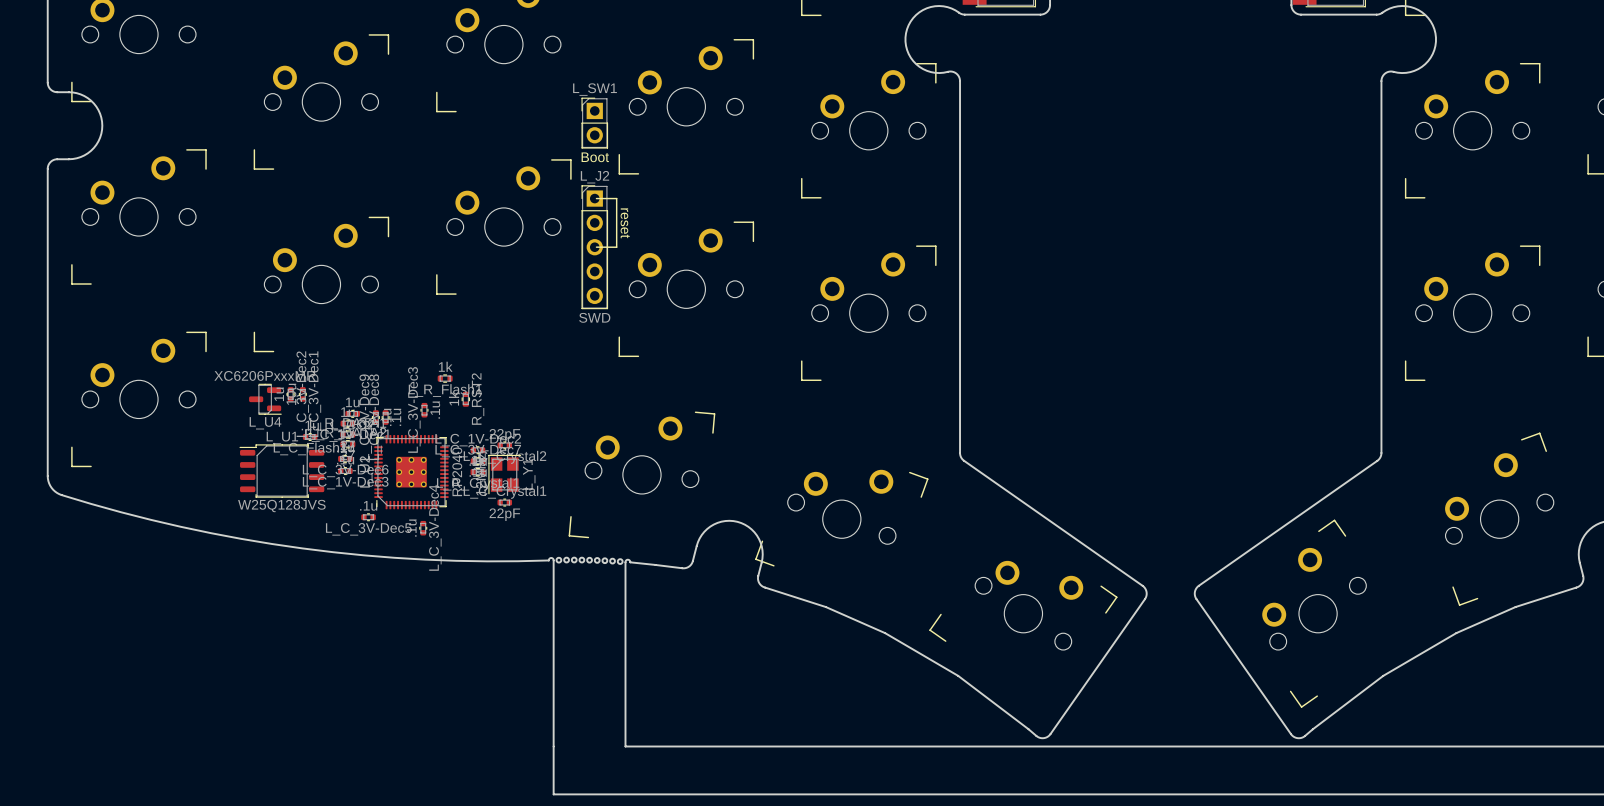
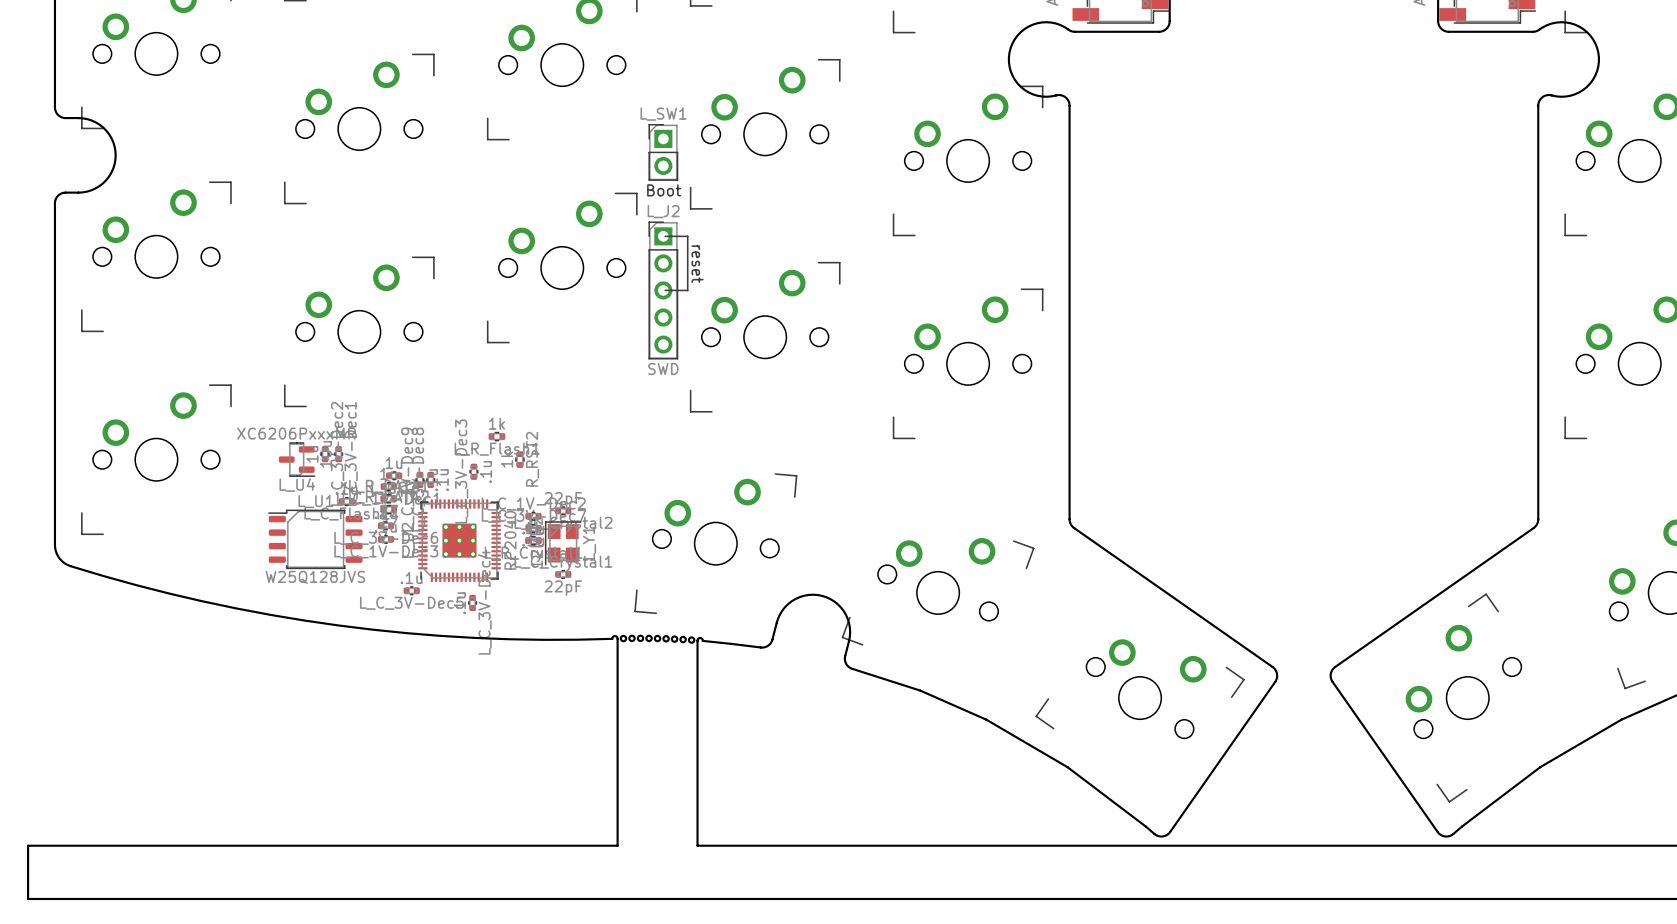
board edge: (553, 746) (553, 794) -> (617, 845) (28, 845) (28, 898) (617, 898)

